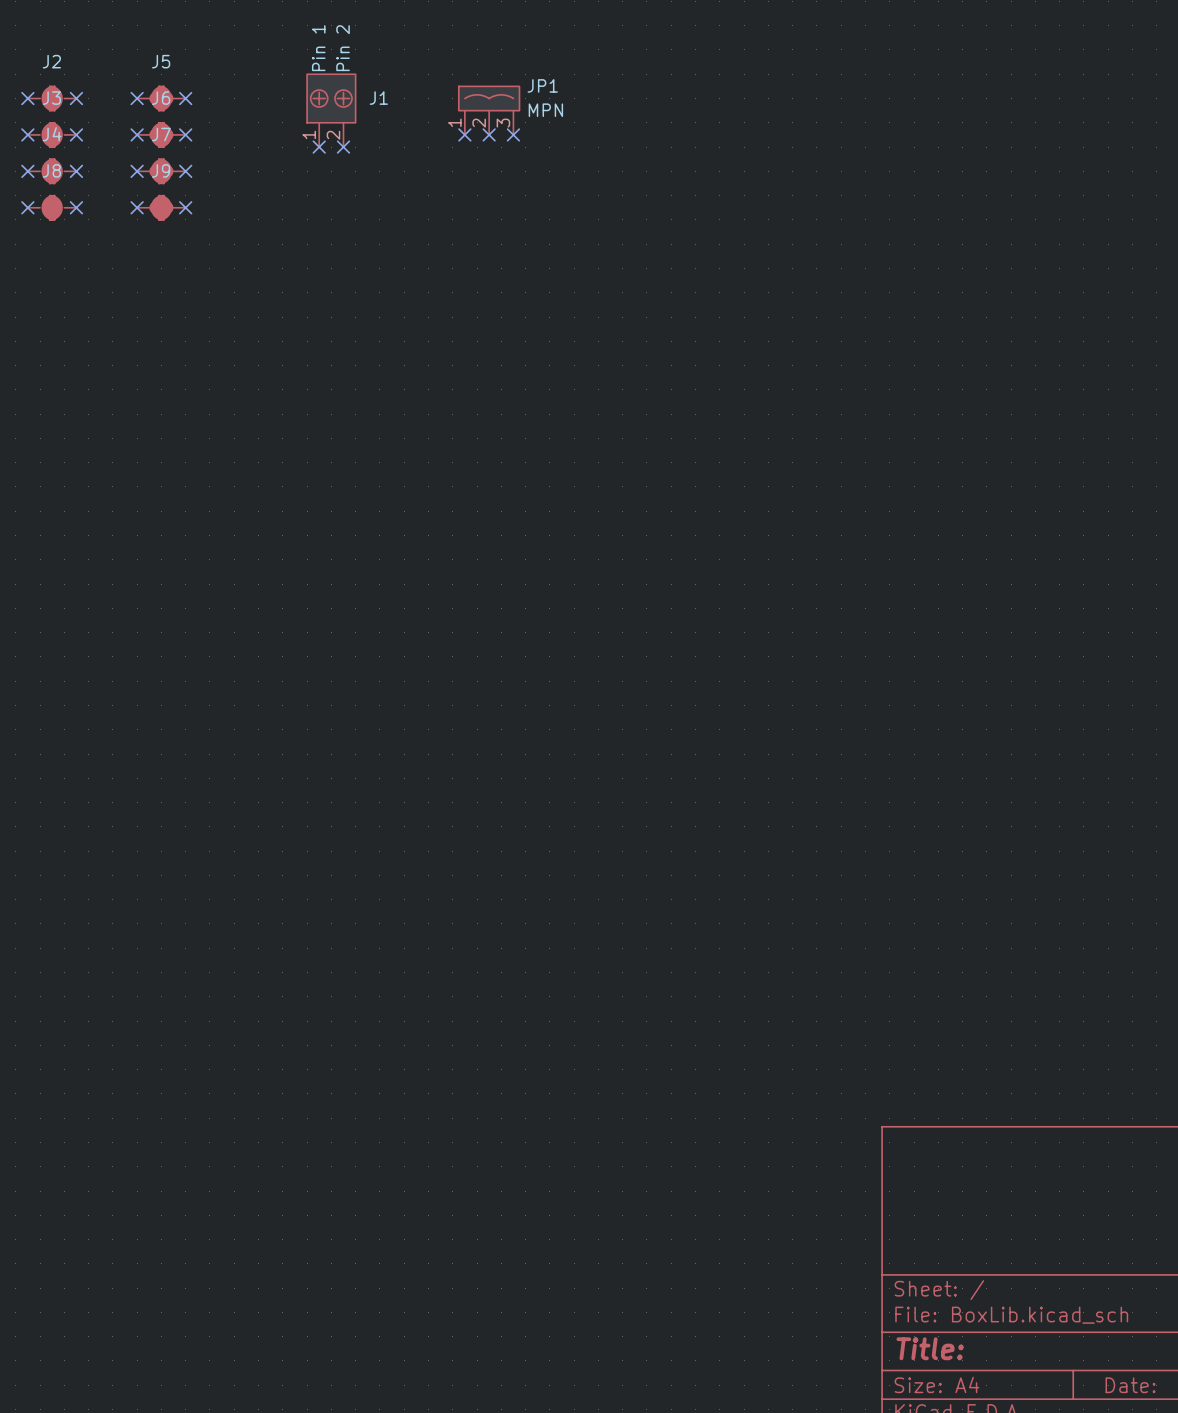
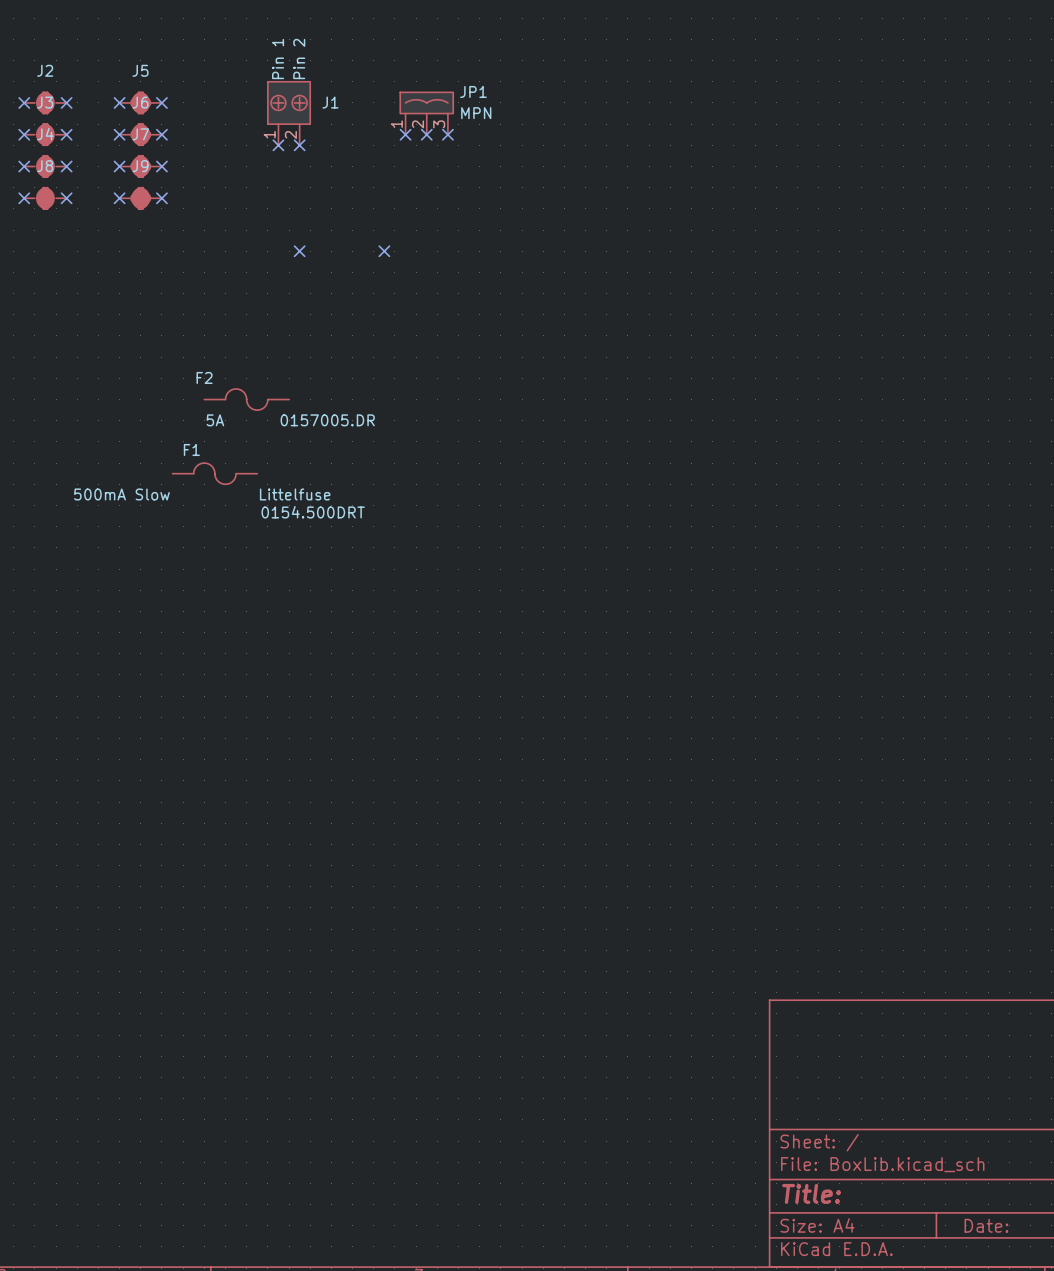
no-connect mark: none -> (299, 251)
no-connect mark: none -> (384, 251)
F2: none -> 0157005.DR (246, 399)
F1: none -> (214, 473)

